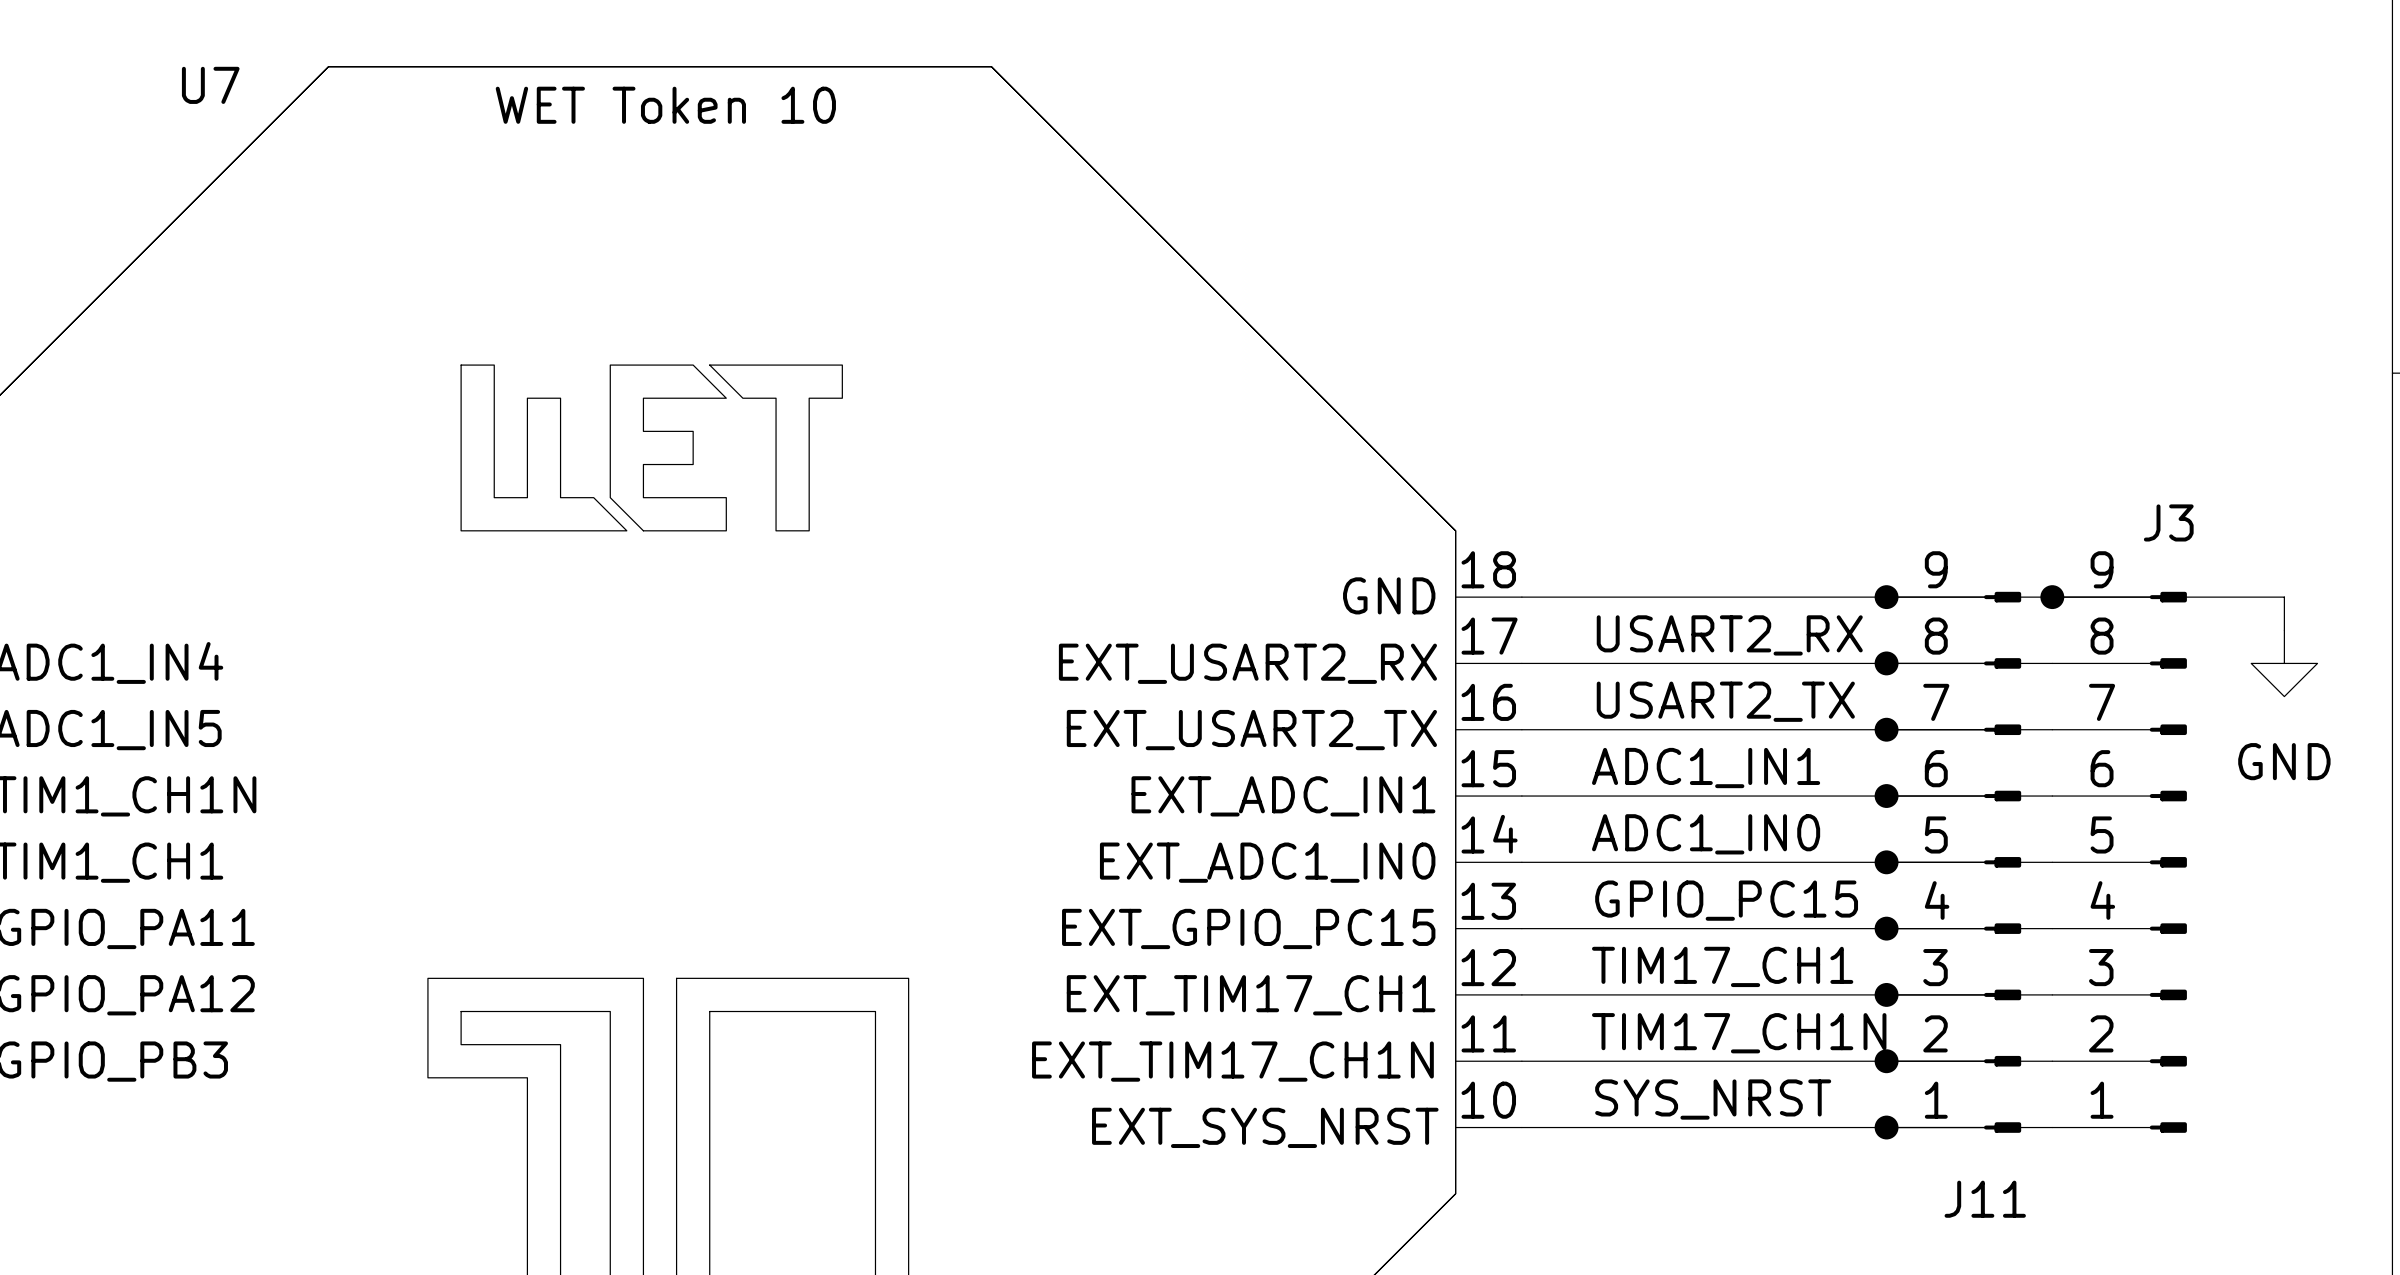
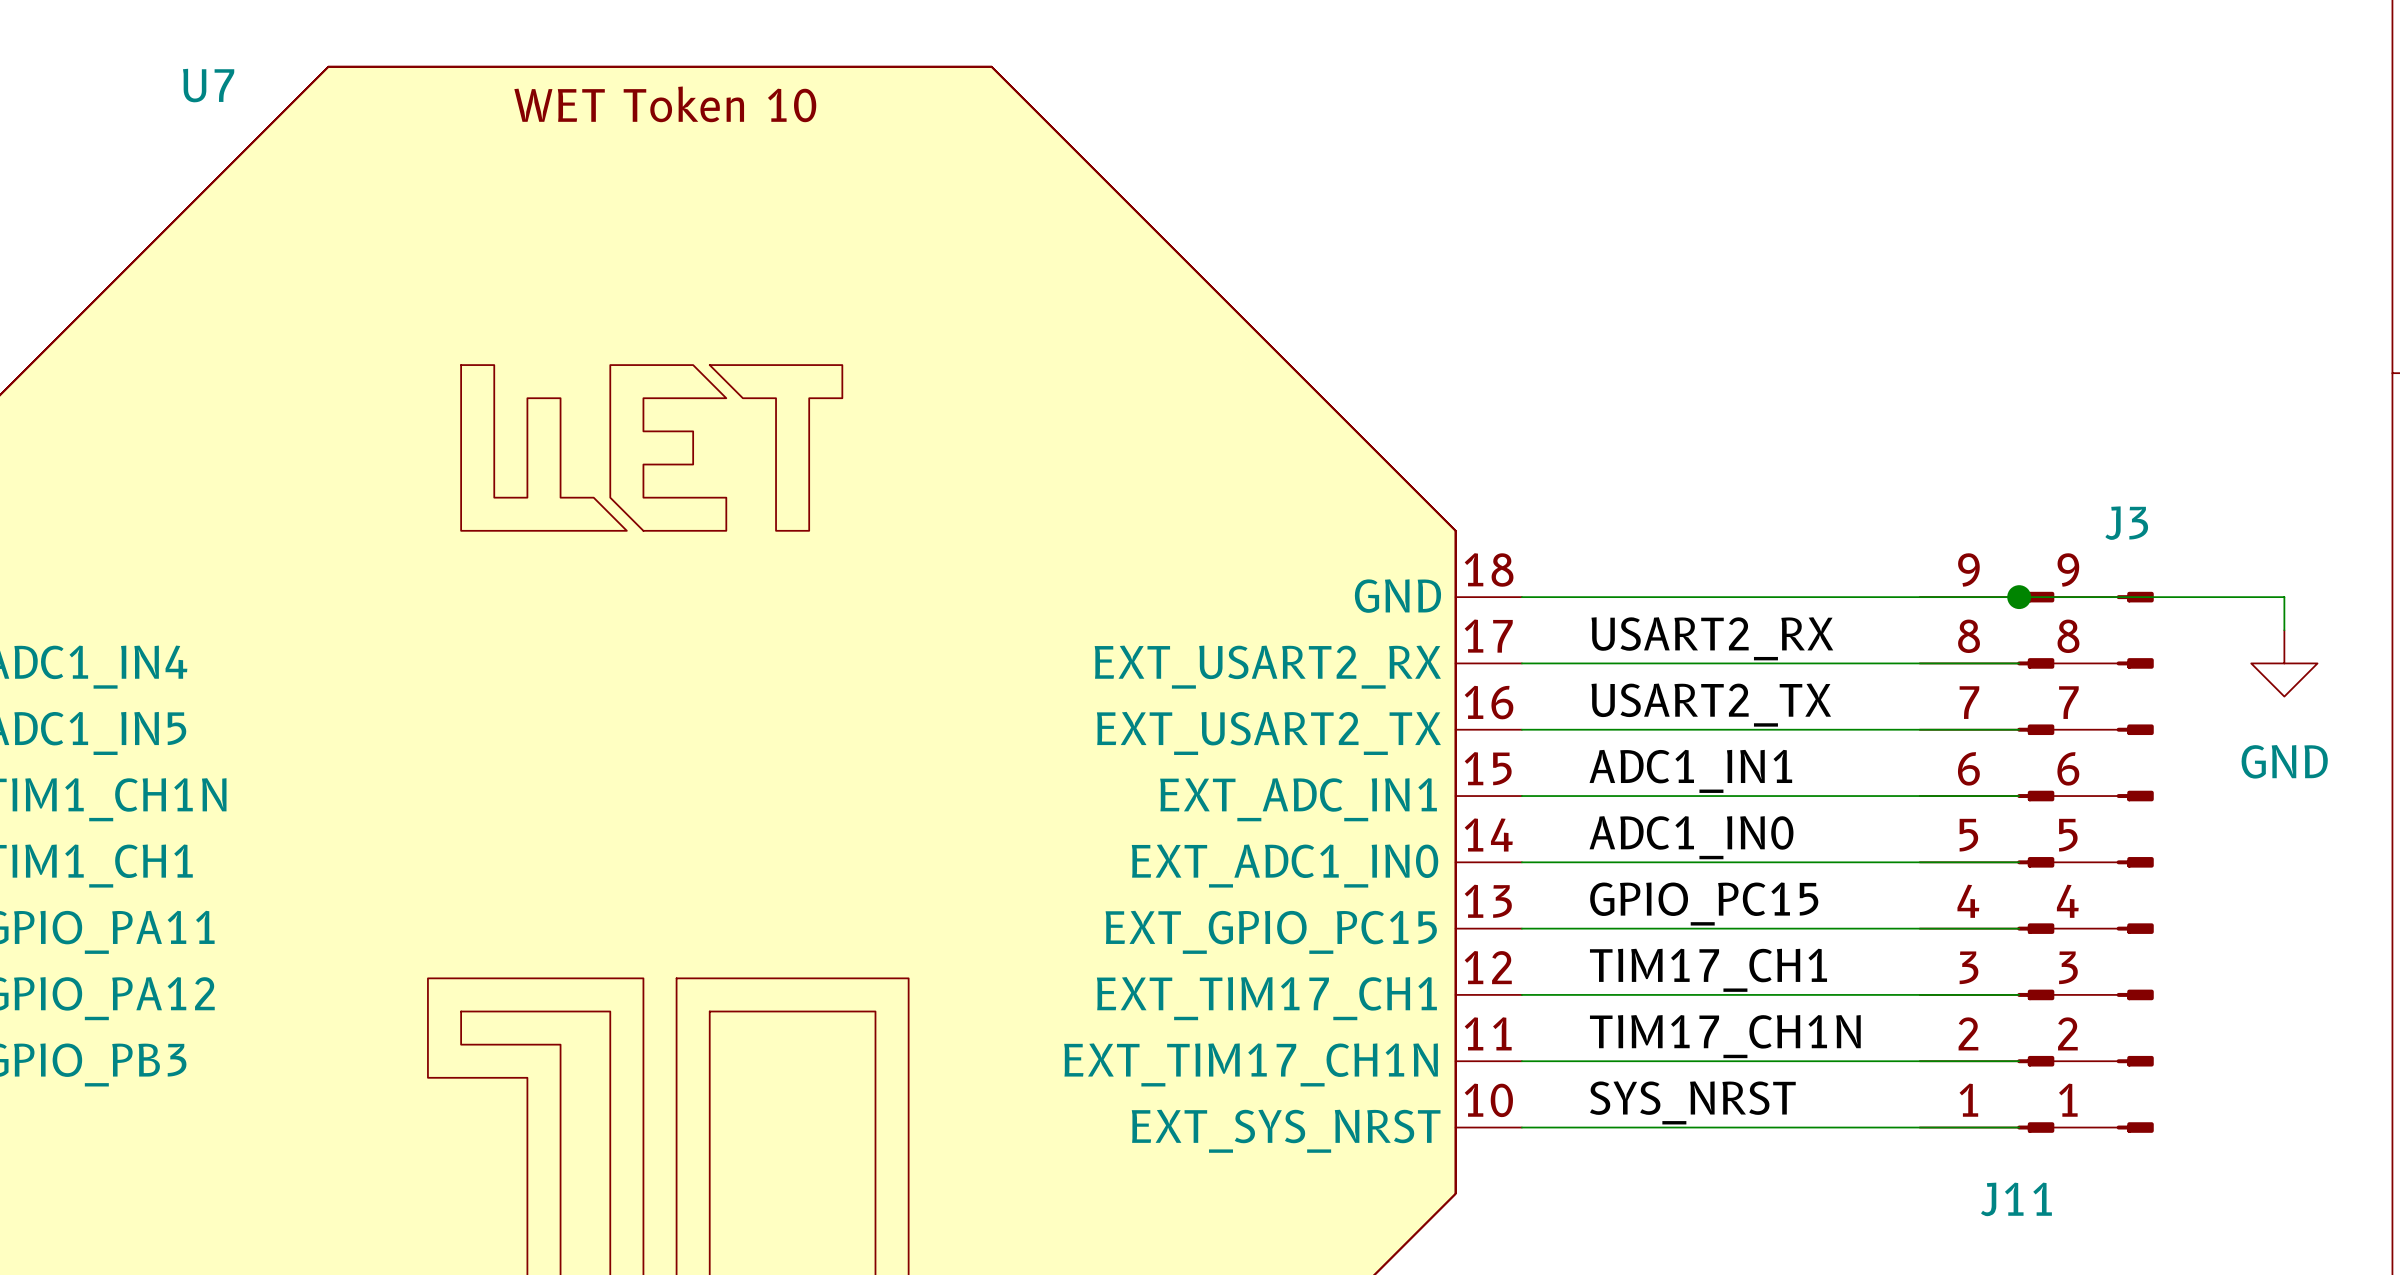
junction: (1886, 597) -> none
junction position: (2052, 597) -> (2019, 597)
junction: (1886, 663) -> none
junction: (1886, 729) -> none
junction: (1886, 796) -> none
junction: (1886, 862) -> none
J11 position: (1953, 862) -> (1987, 862)
J3 position: (2119, 862) -> (2086, 862)
junction: (1886, 928) -> none
junction: (1886, 994) -> none
junction: (1886, 1061) -> none
junction: (1886, 1127) -> none

